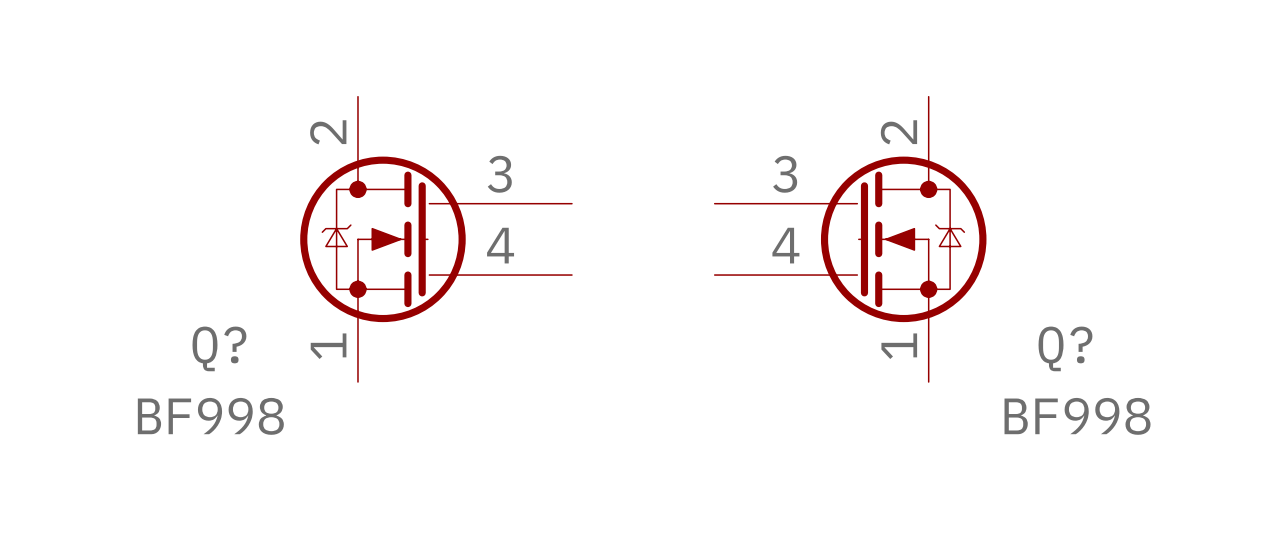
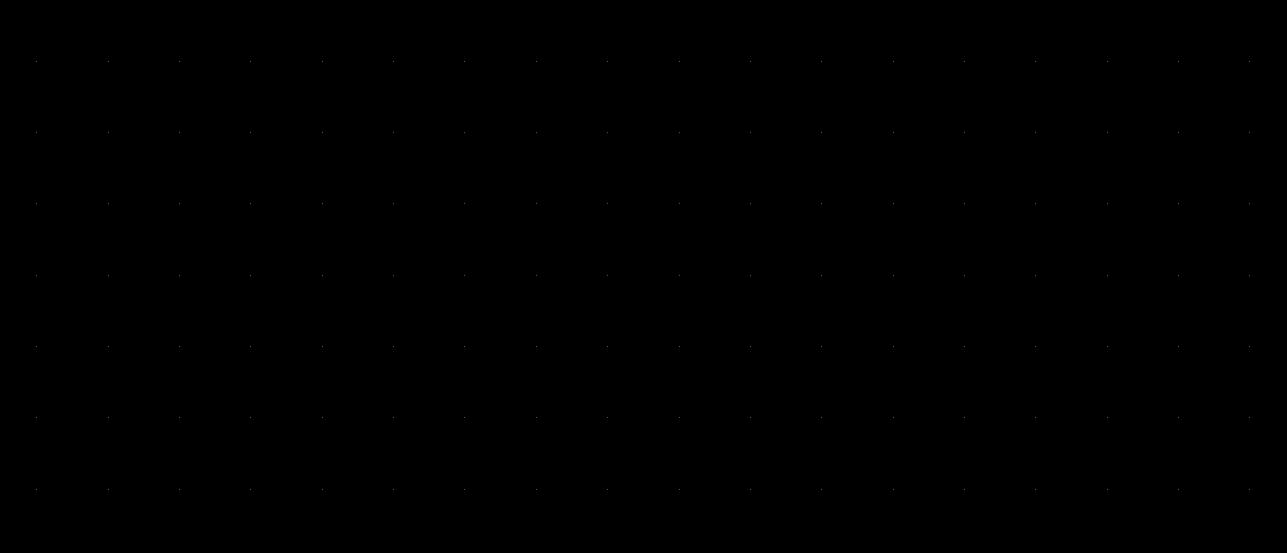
Q?: BF998 (436, 239) -> none
Q?: BF998 (850, 239) -> none

